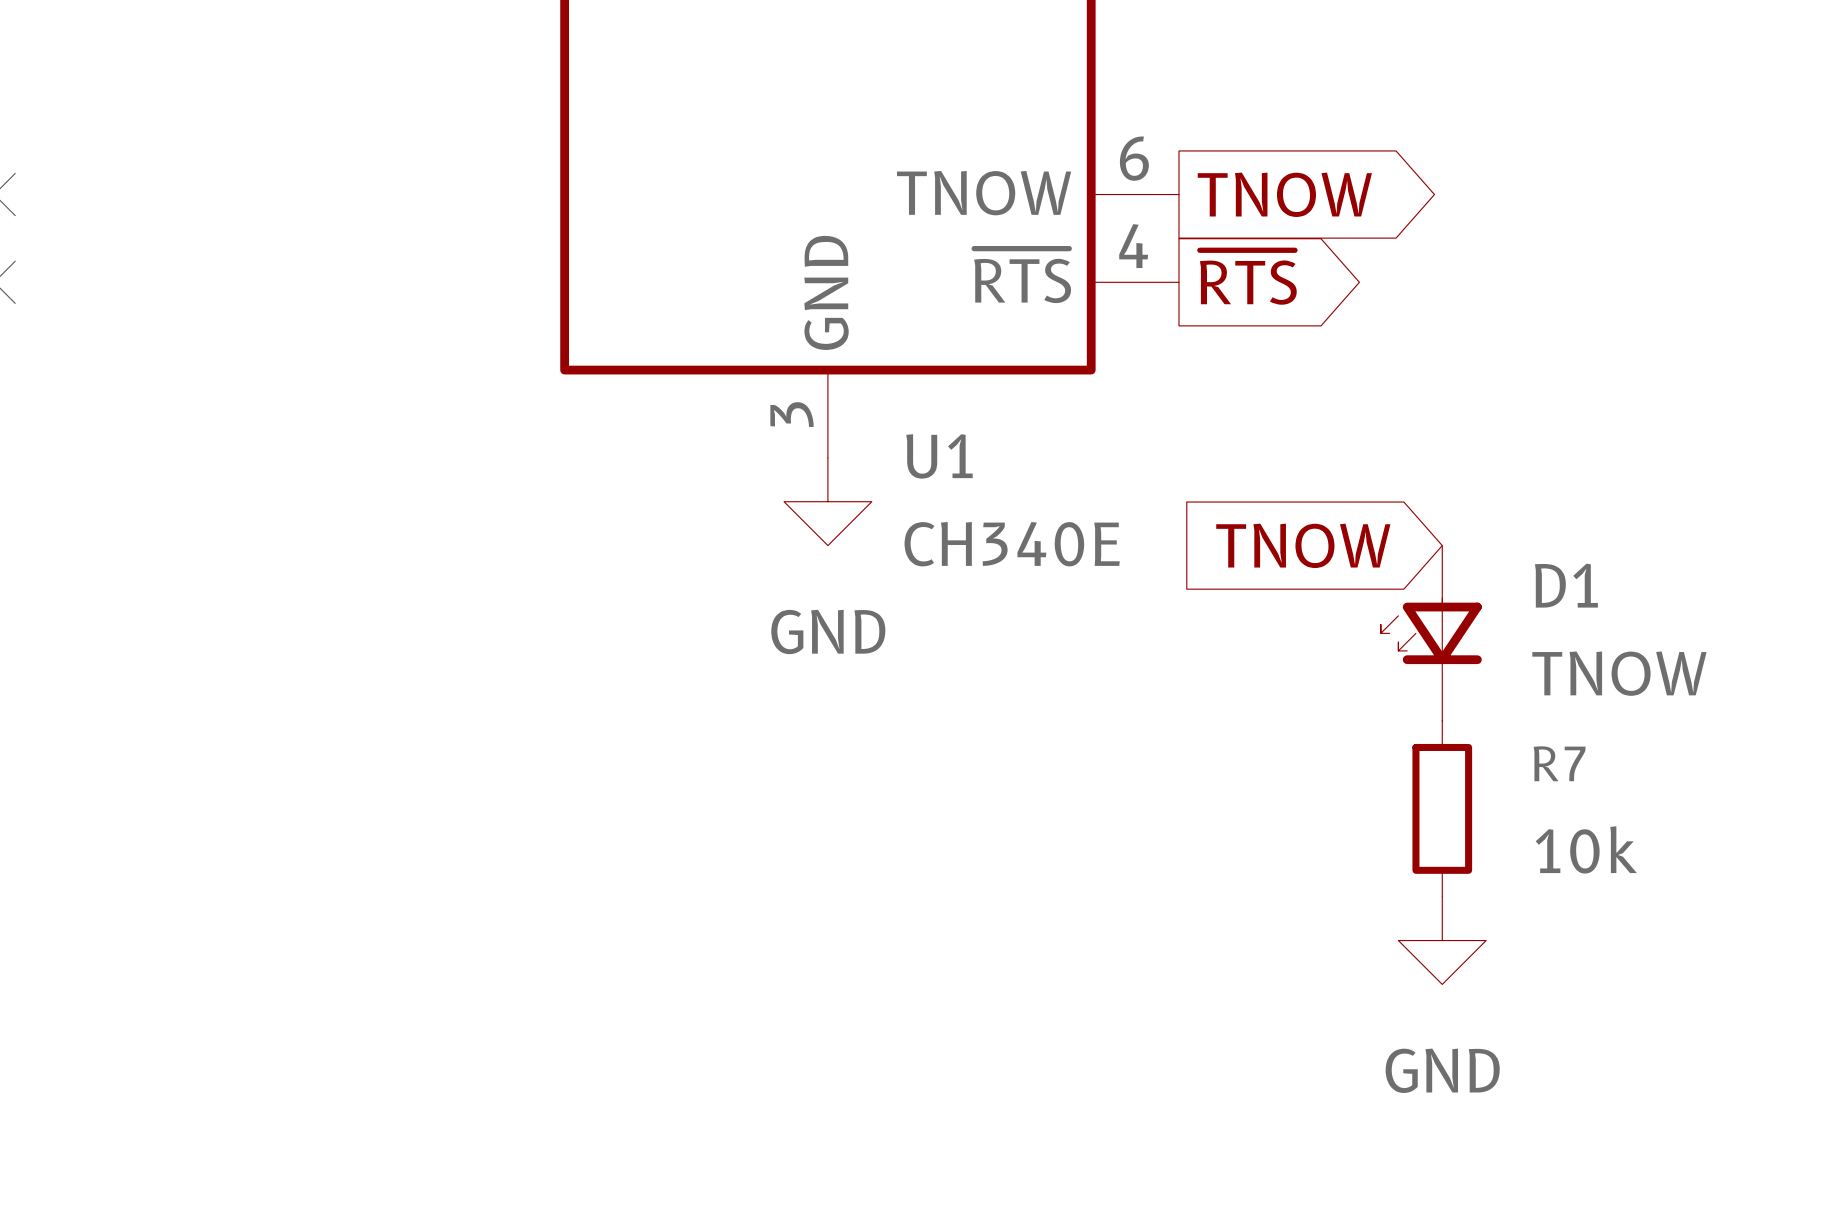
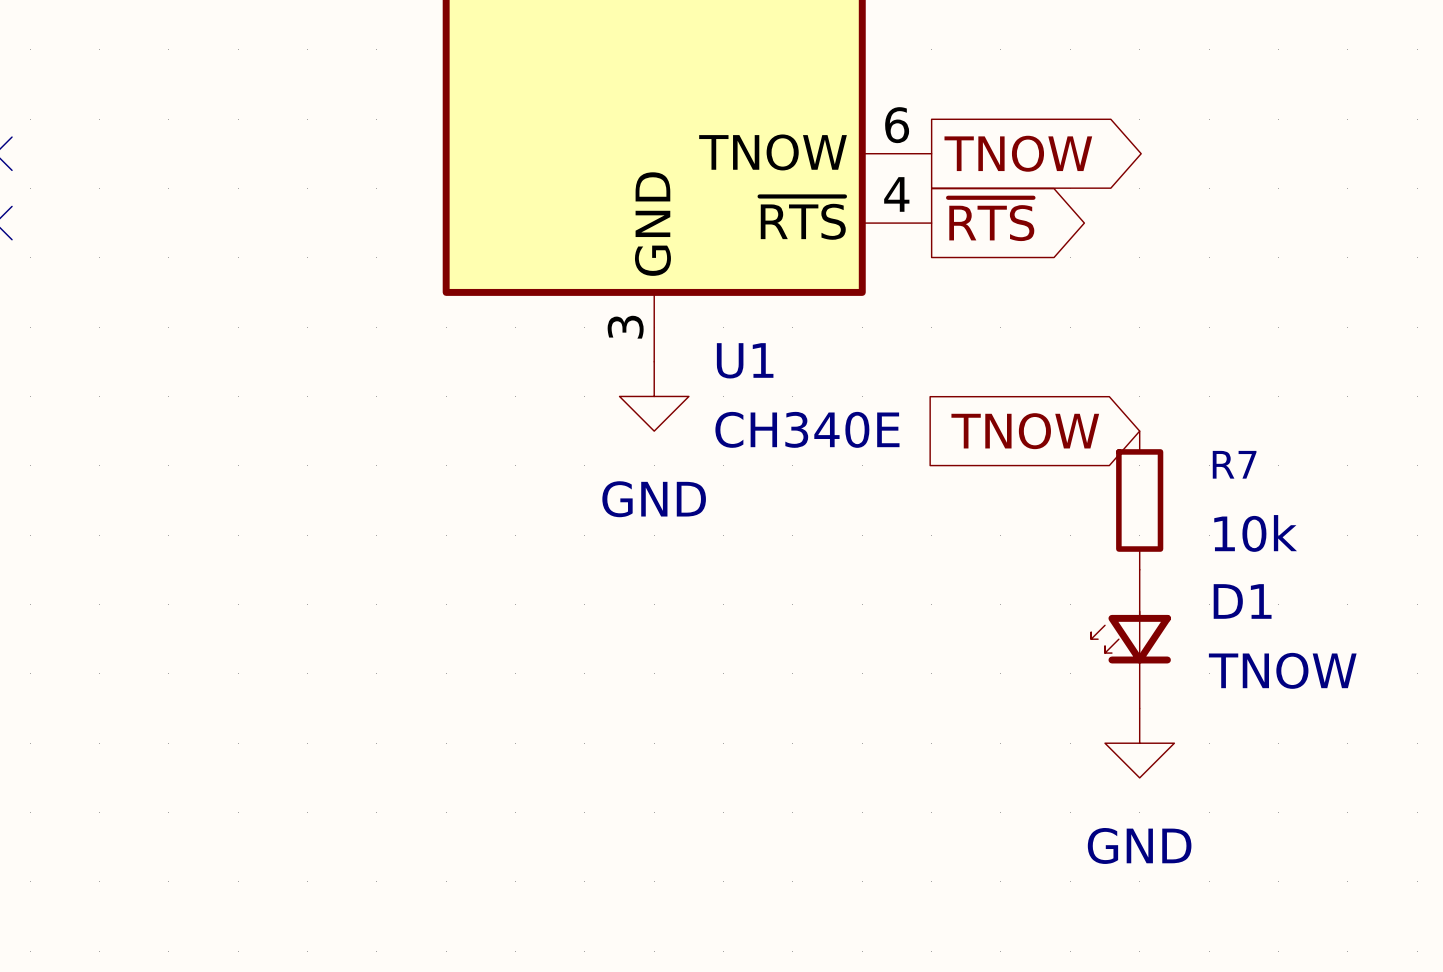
D1 position: (1431, 633) -> (1131, 639)
R7 position: (1442, 808) -> (1139, 500)

